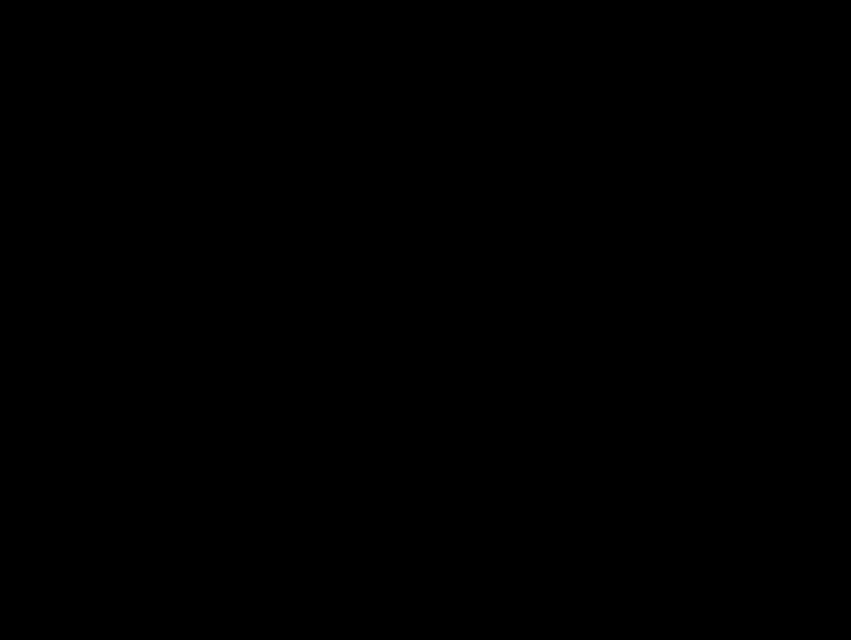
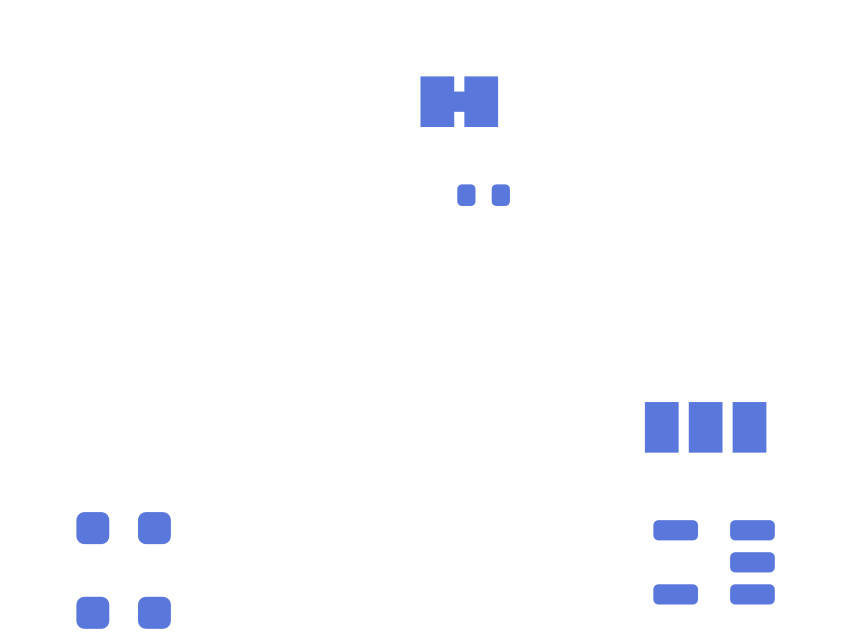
part: none -> (459, 101)
part: none -> (483, 195)
part: none -> (705, 427)
part: none -> (123, 528)
part: none -> (714, 562)
part: none -> (123, 612)

